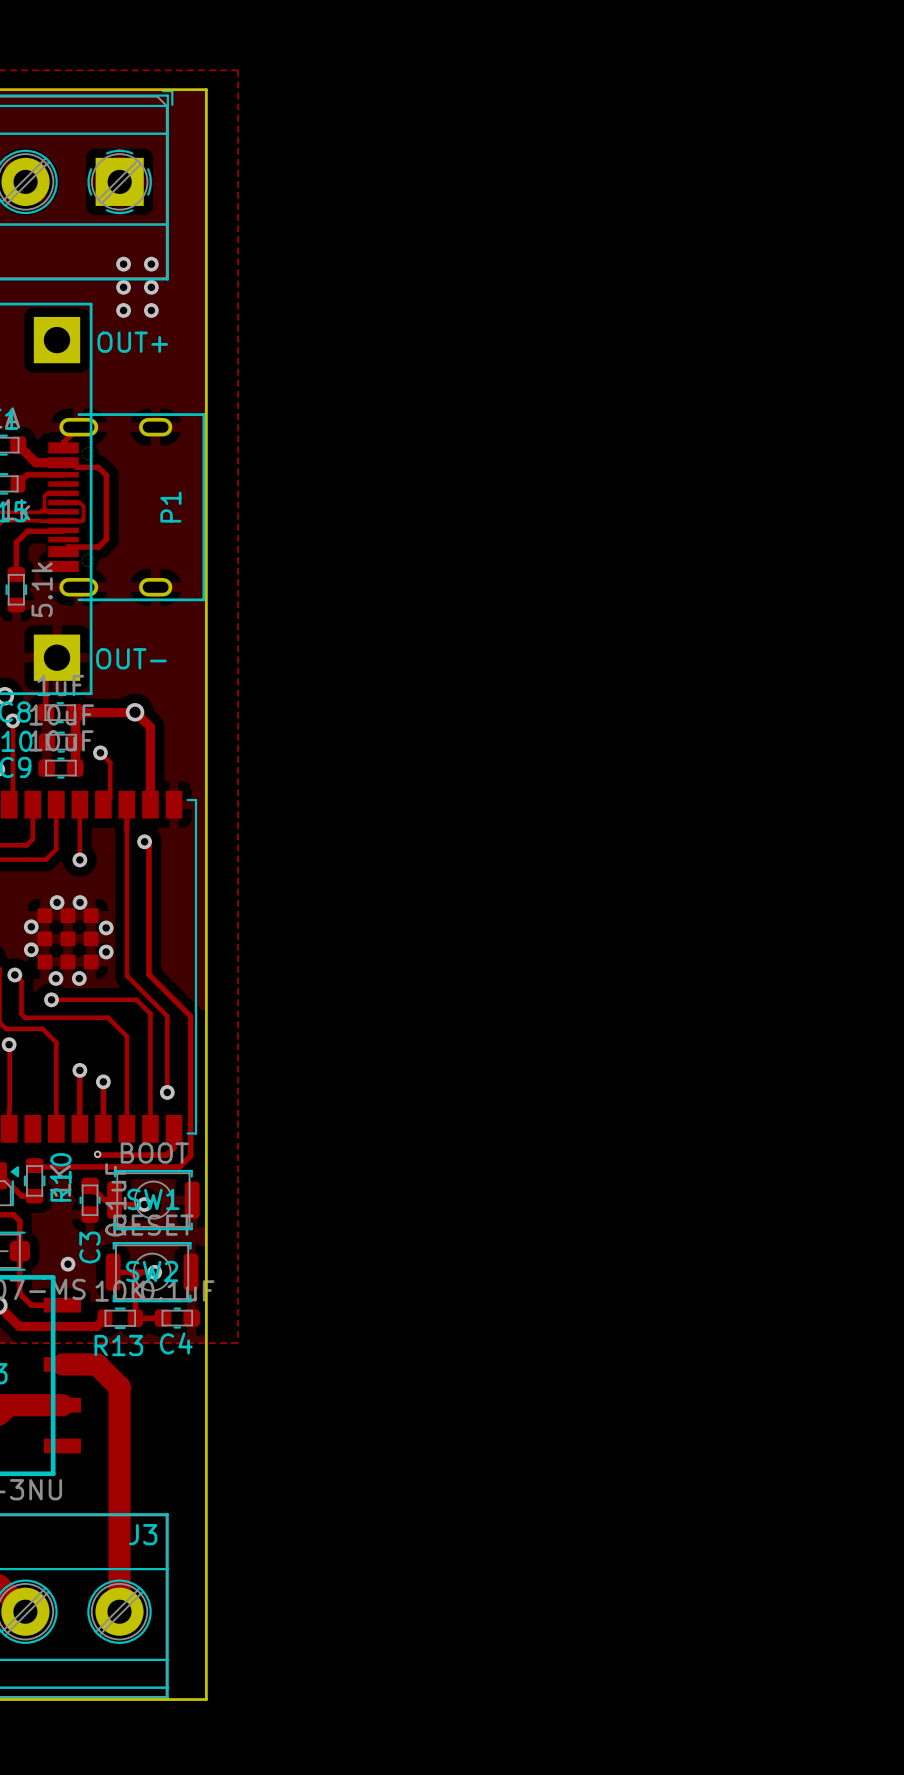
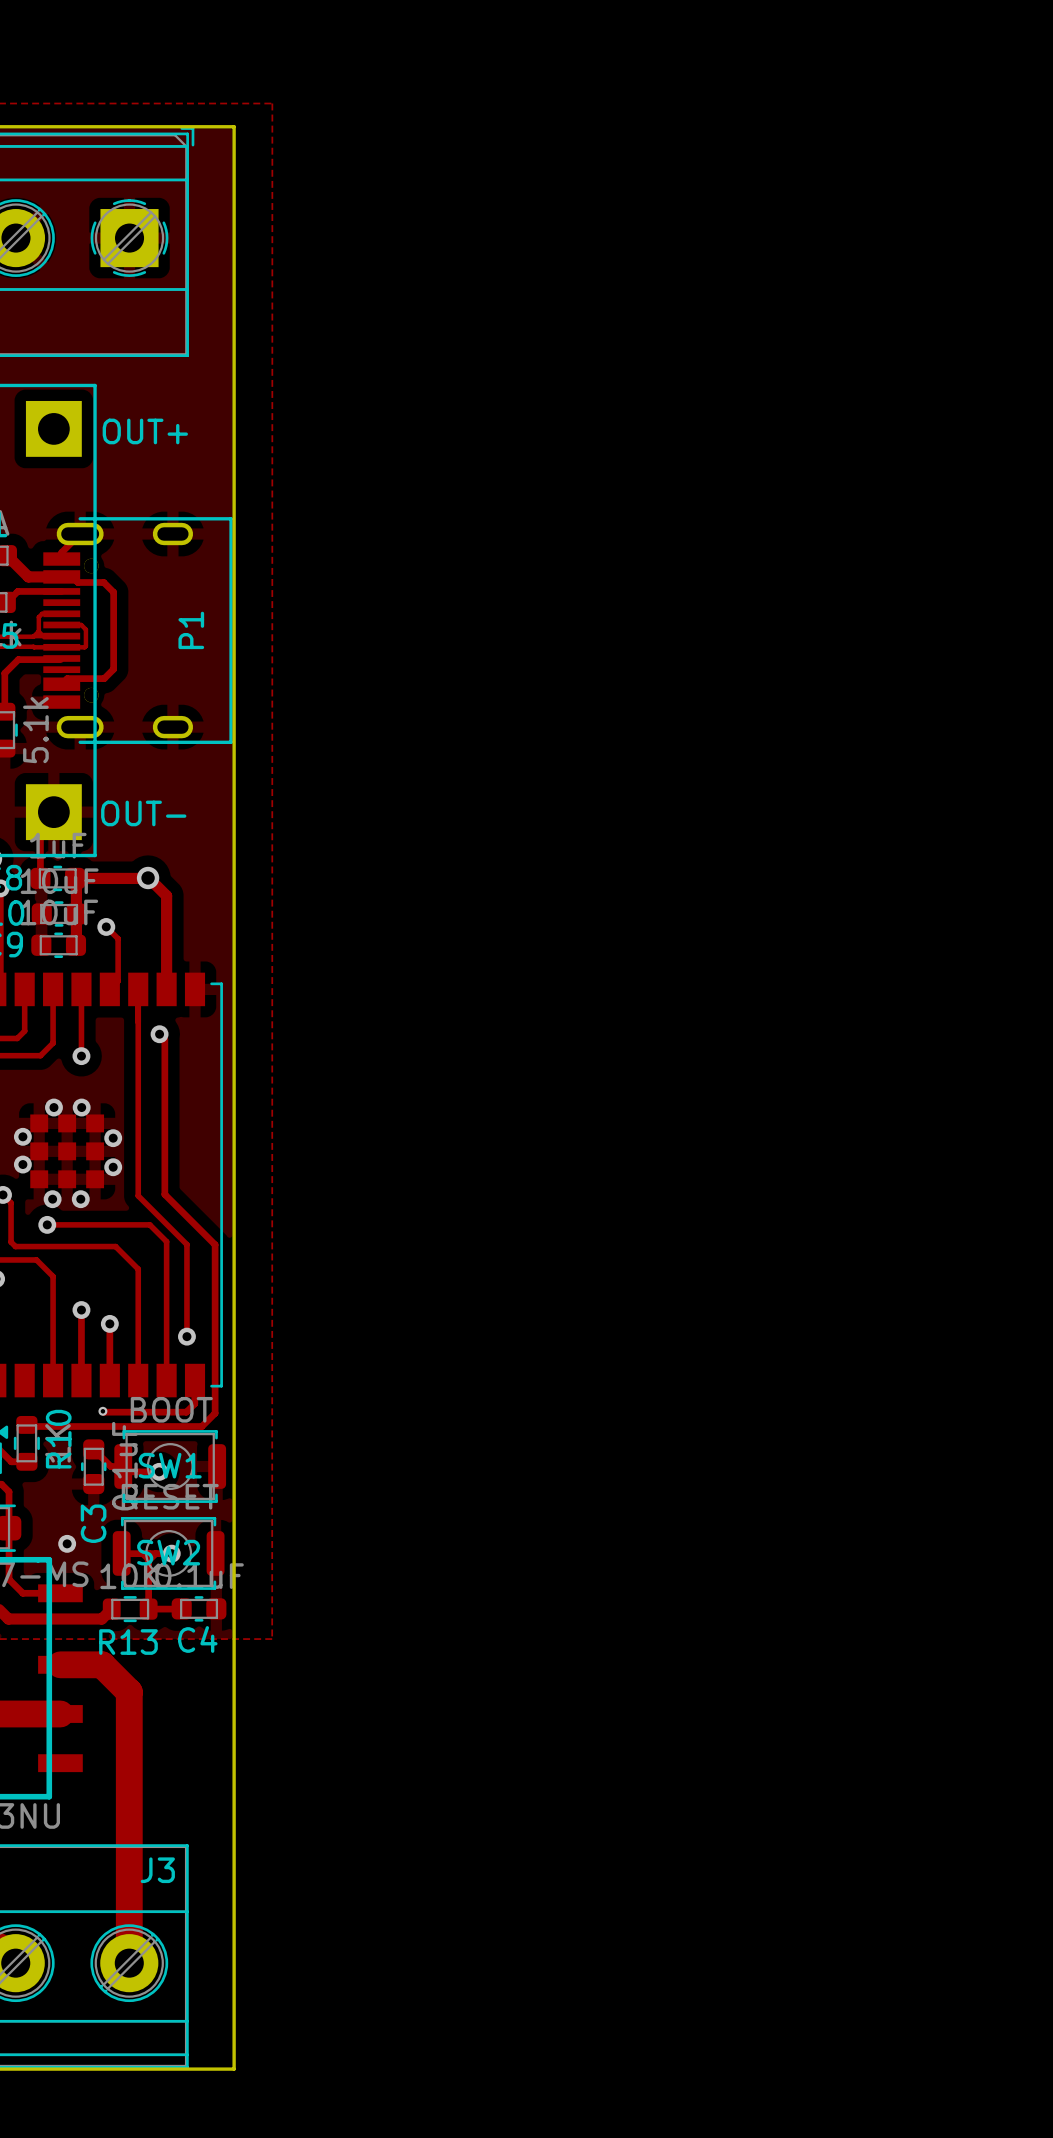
via: (123, 264) -> none
via: (151, 264) -> none
via: (123, 287) -> none
via: (151, 287) -> none
via: (123, 310) -> none
via: (151, 310) -> none

